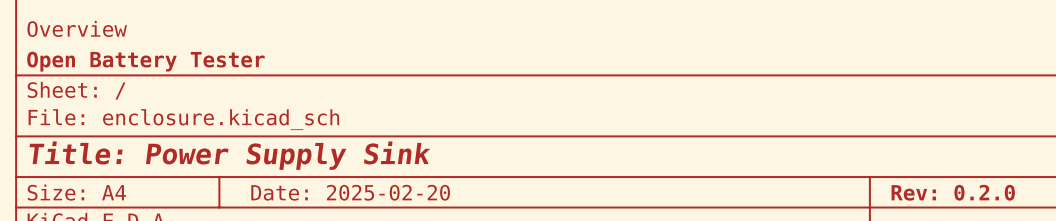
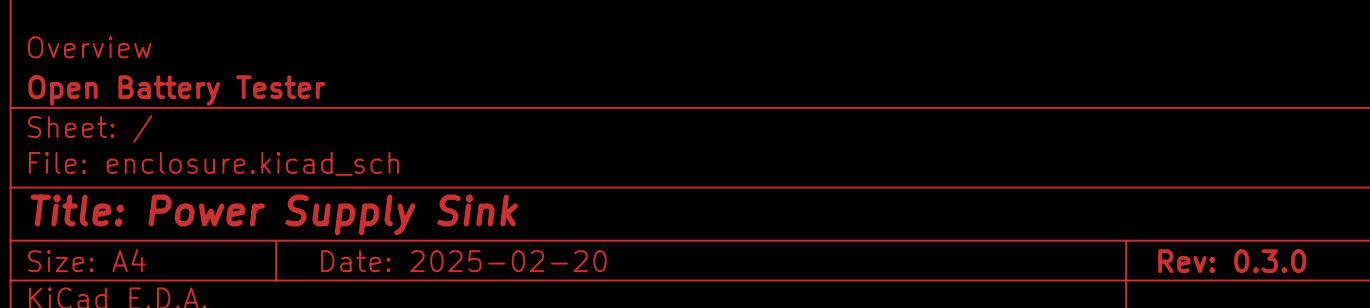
title block: Rev: 0.2.0 (953, 192) -> Rev: 0.3.0 (1232, 261)

